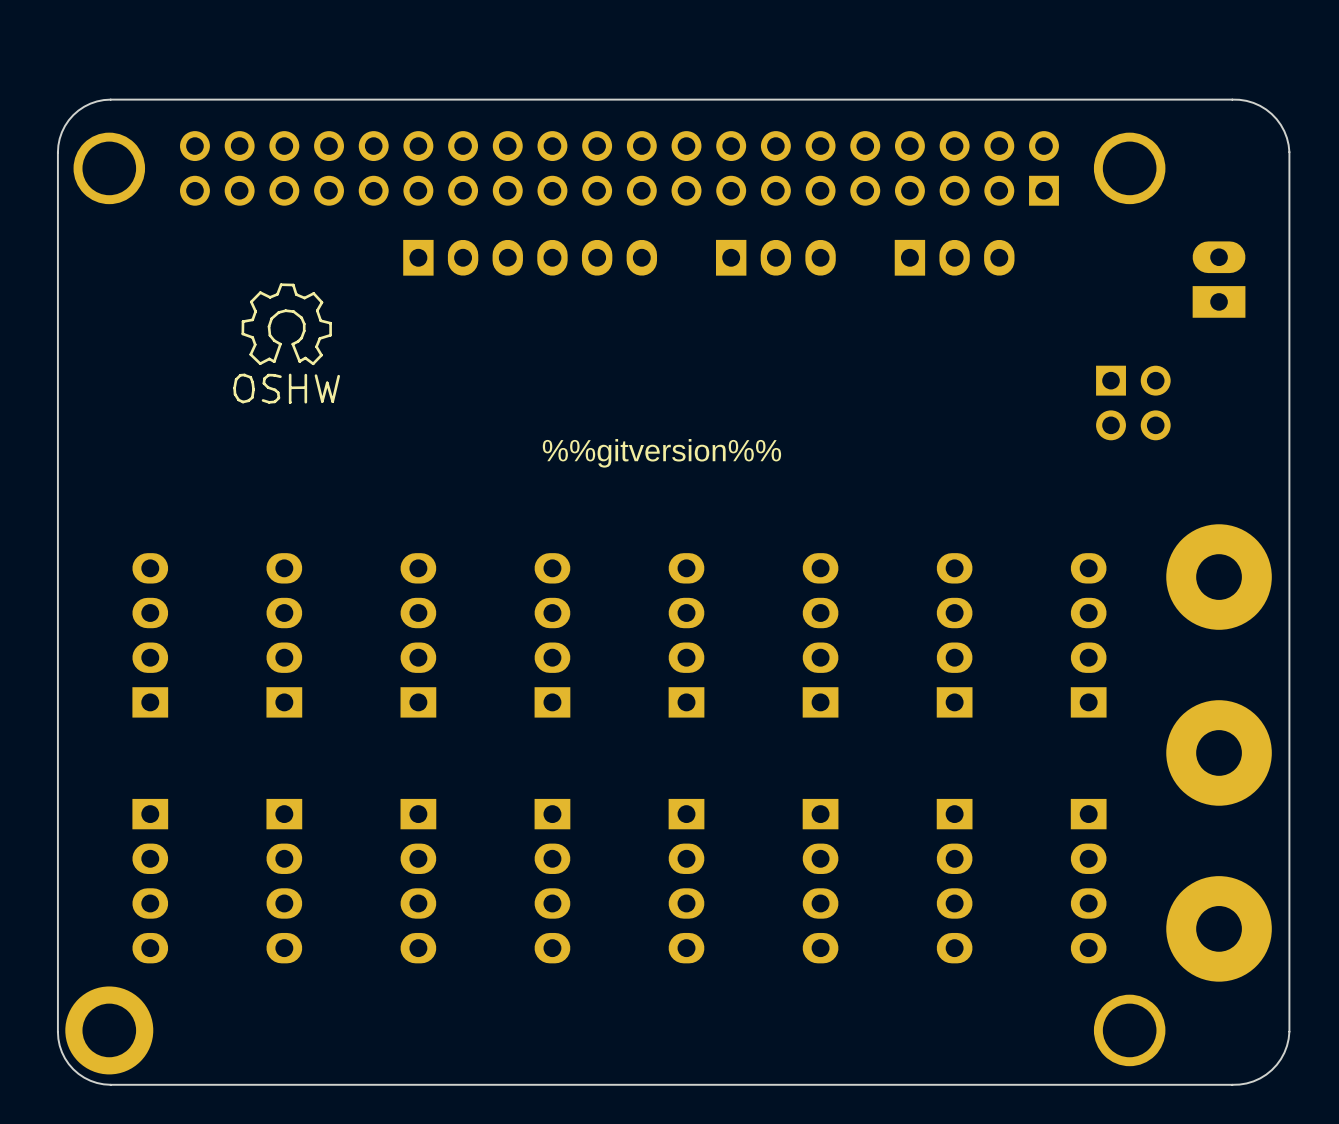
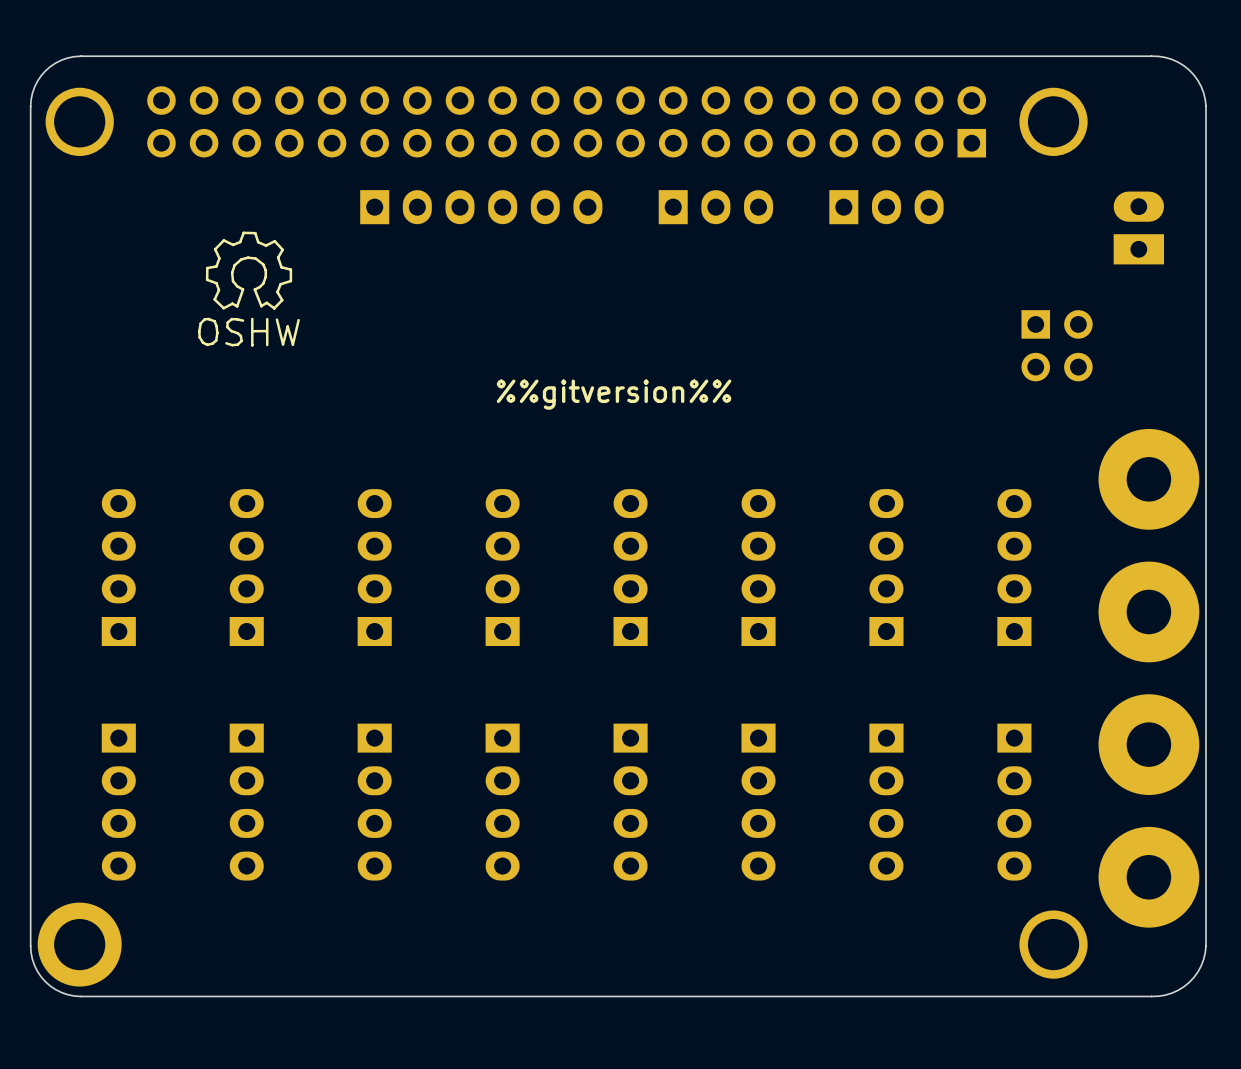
part: none -> (1148, 479)
part: (1219, 577) -> none
part: none -> (1148, 611)
part: (1219, 752) -> none
part: none -> (1148, 744)
part: (1219, 928) -> none
part: none -> (1148, 877)

